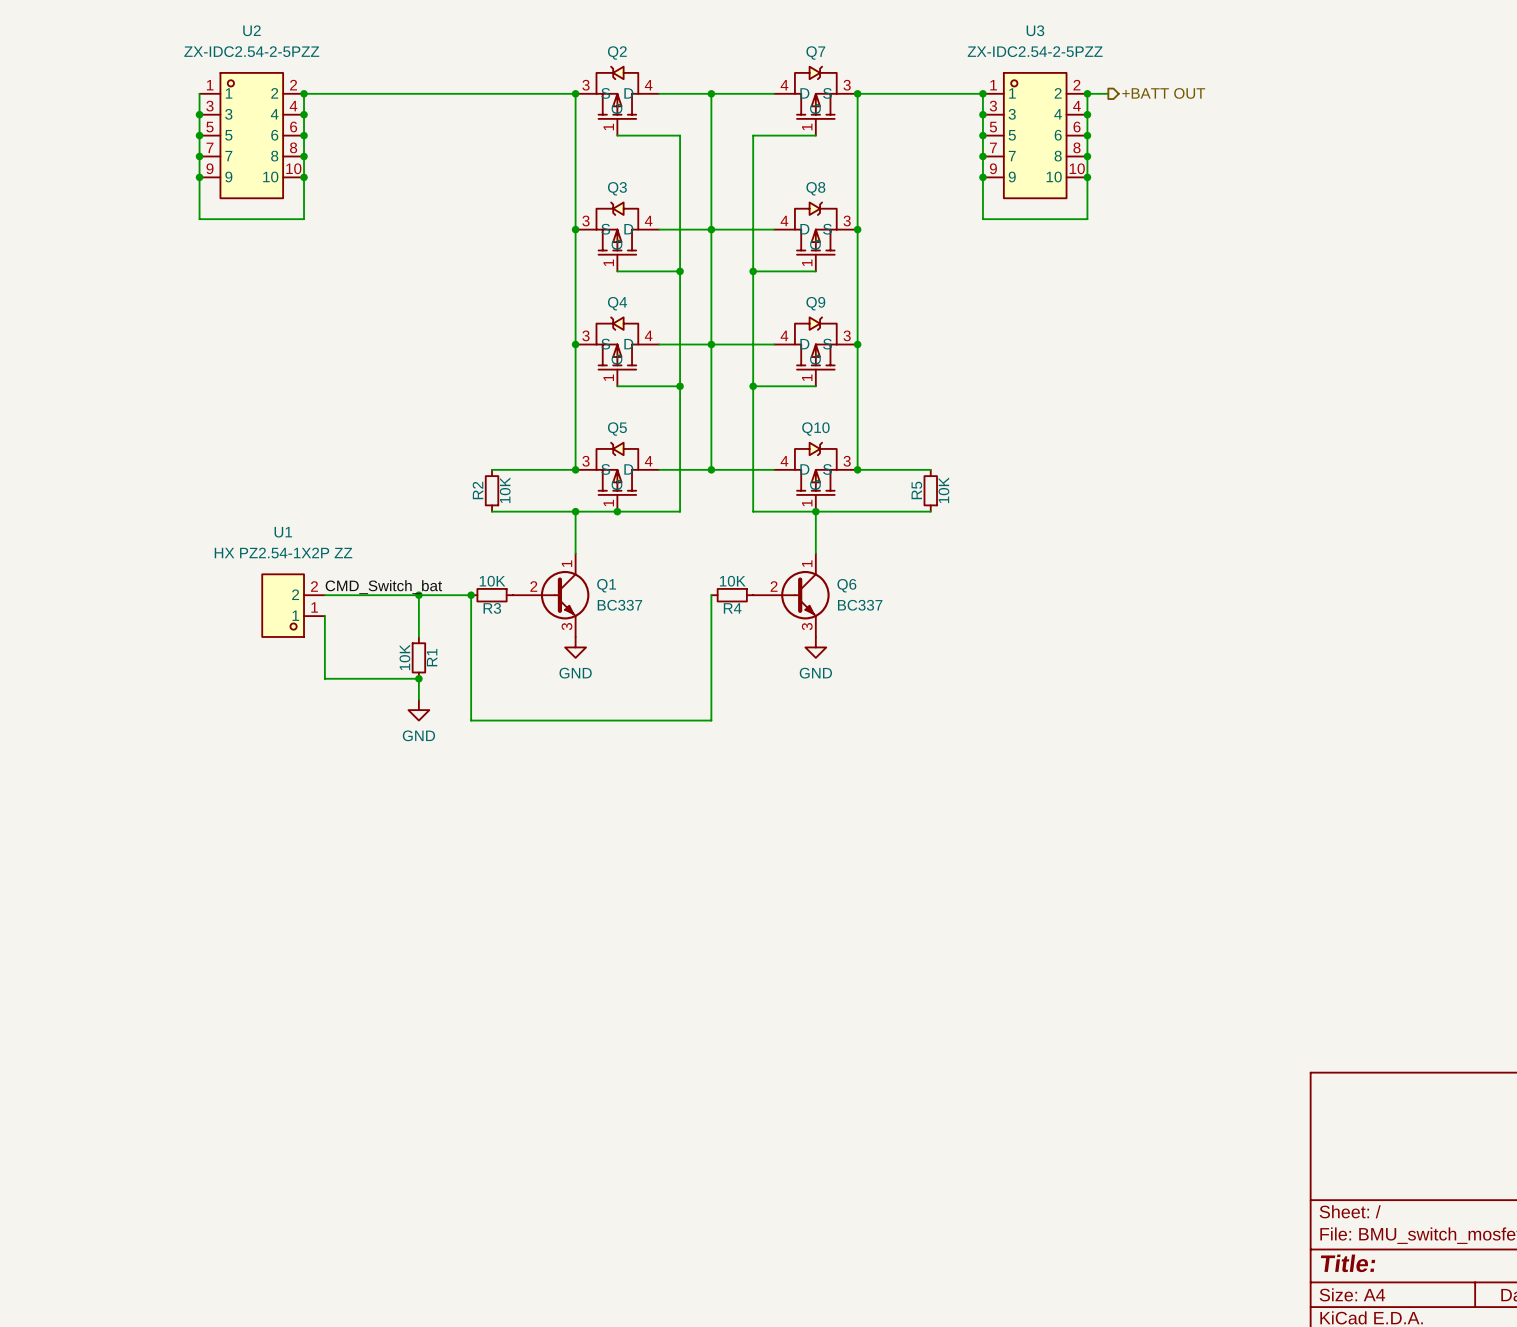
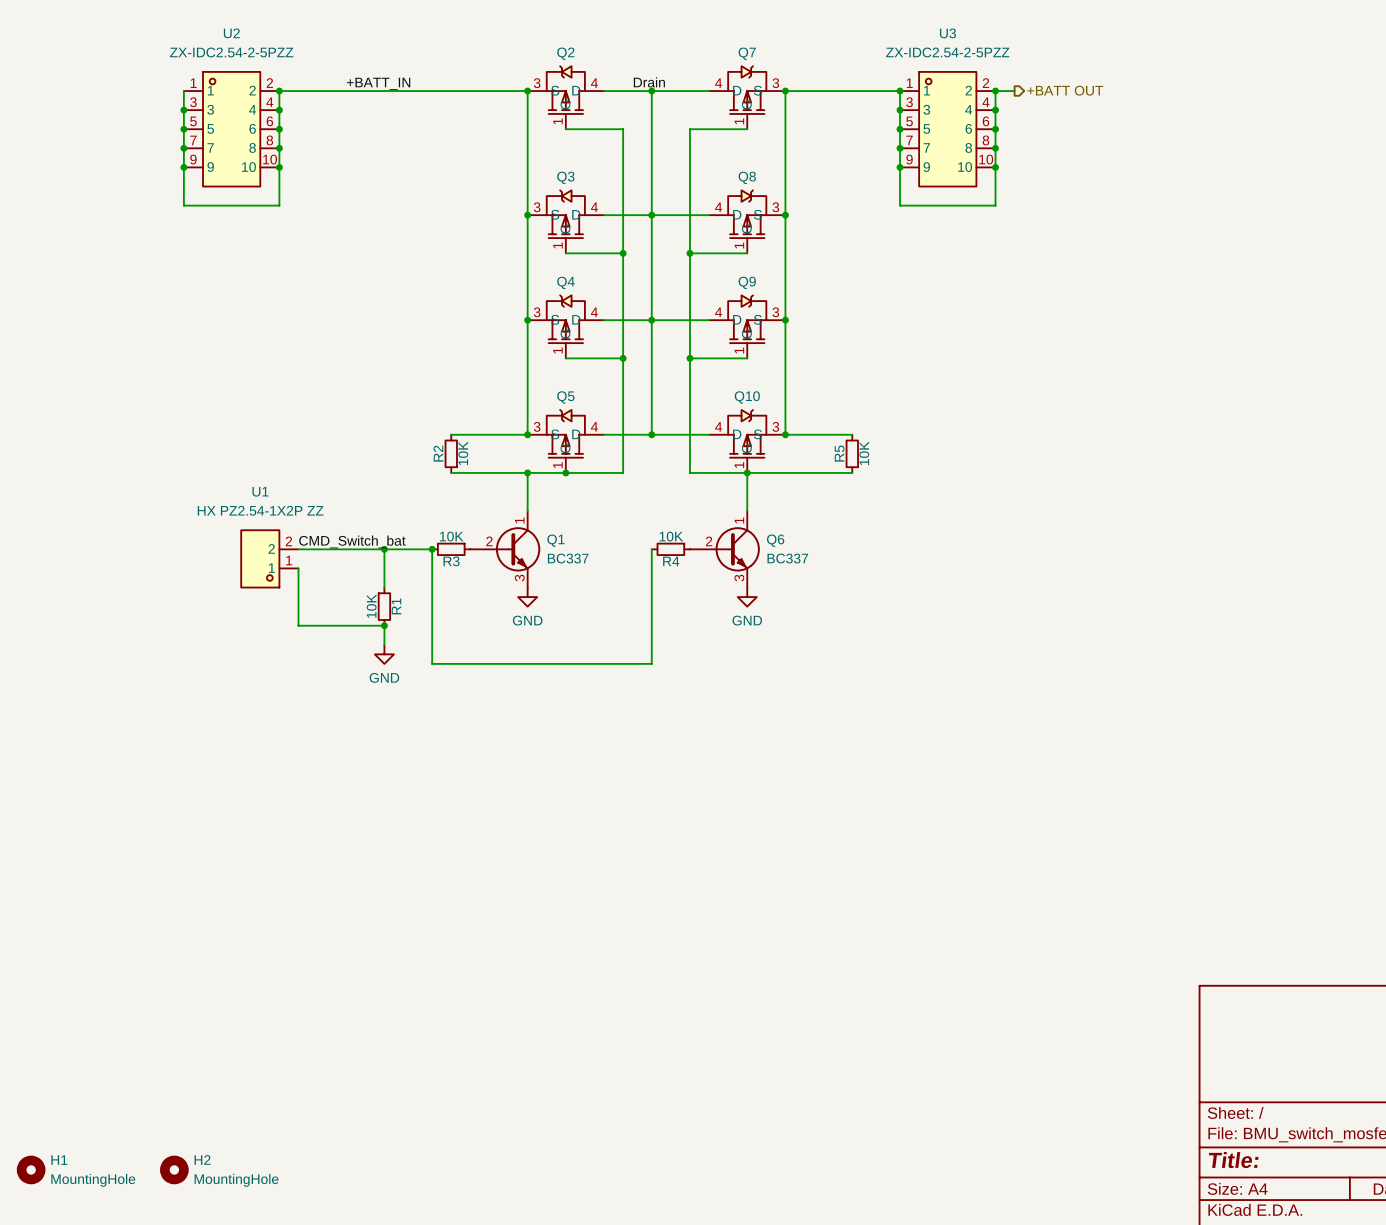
label: none -> Drain (649, 82)
label: none -> +BATT_IN (378, 83)
H1: none -> MountingHole (31, 1169)
H2: none -> MountingHole (174, 1169)

